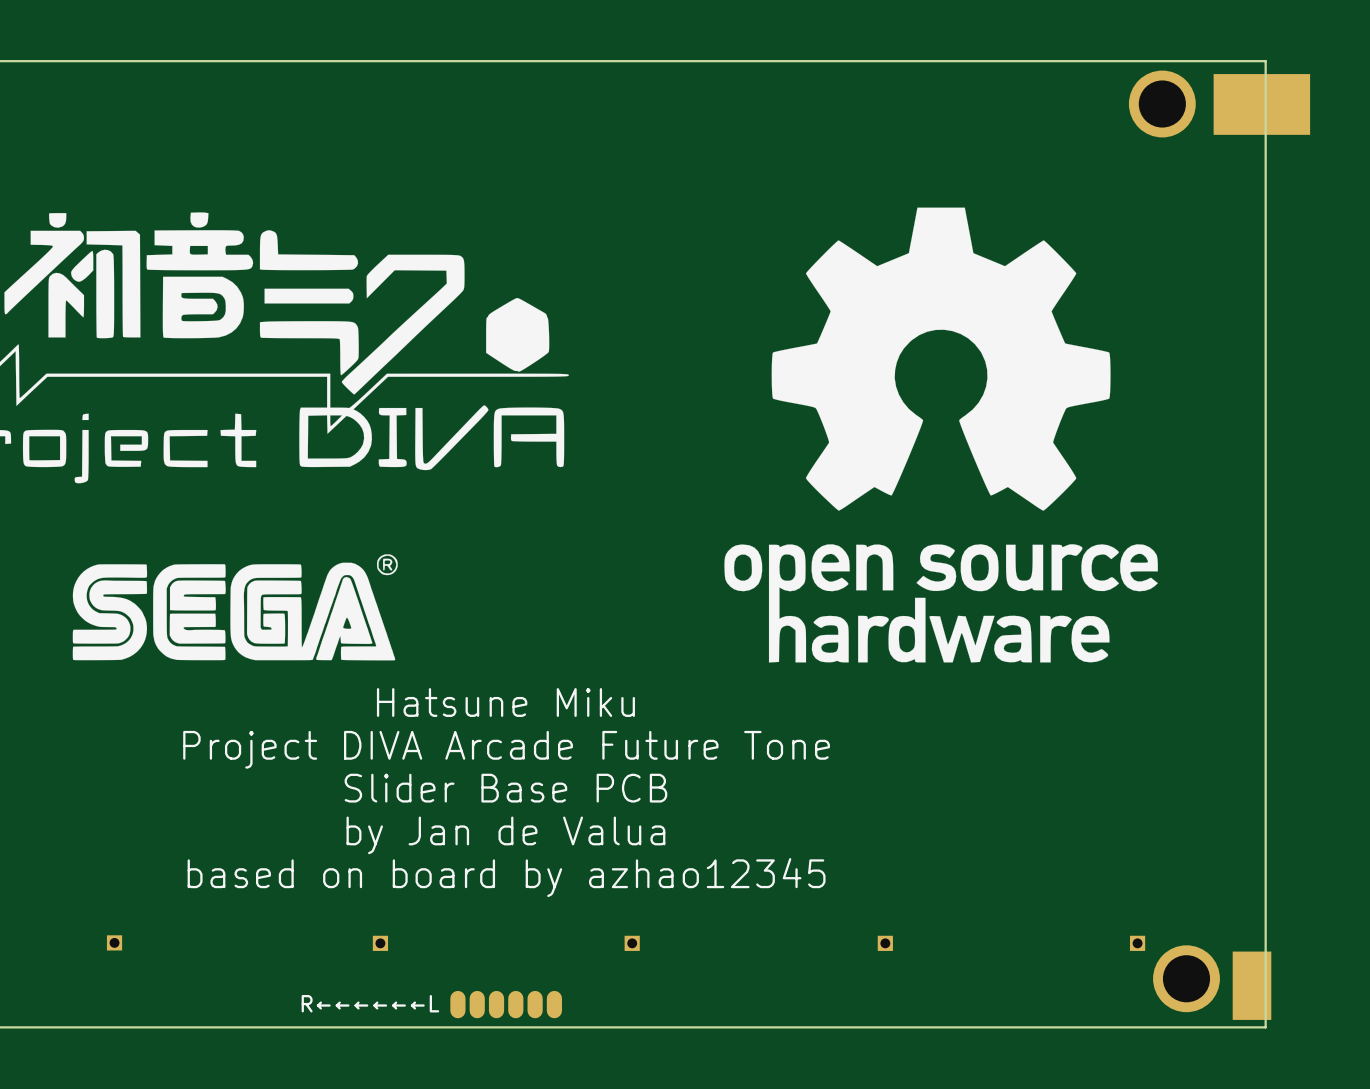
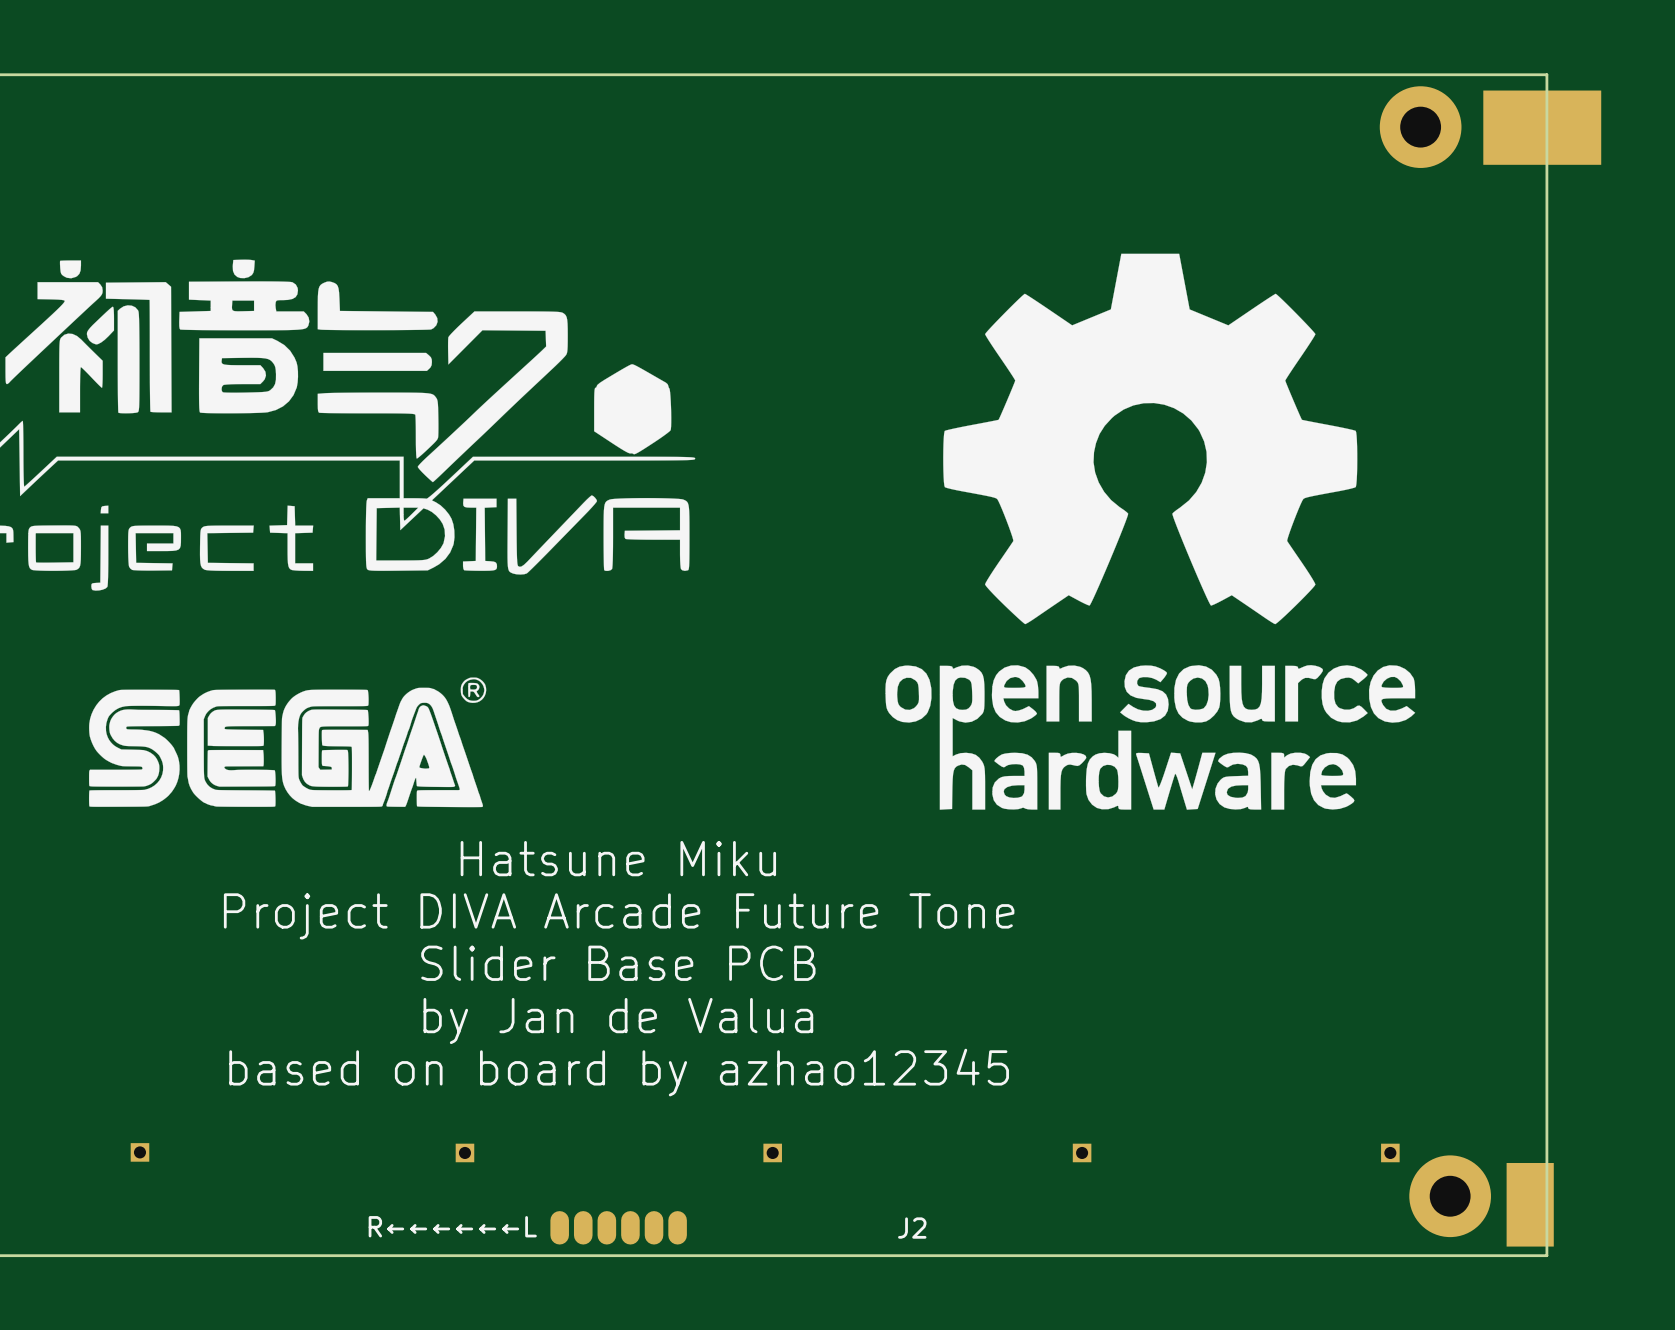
part footprint: [1128, 70, 1196, 138] -> [1379, 86, 1462, 168]
part footprint: [1153, 945, 1220, 1013] -> [1409, 1155, 1492, 1238]
J2 name: none -> J2 (912, 1228)

